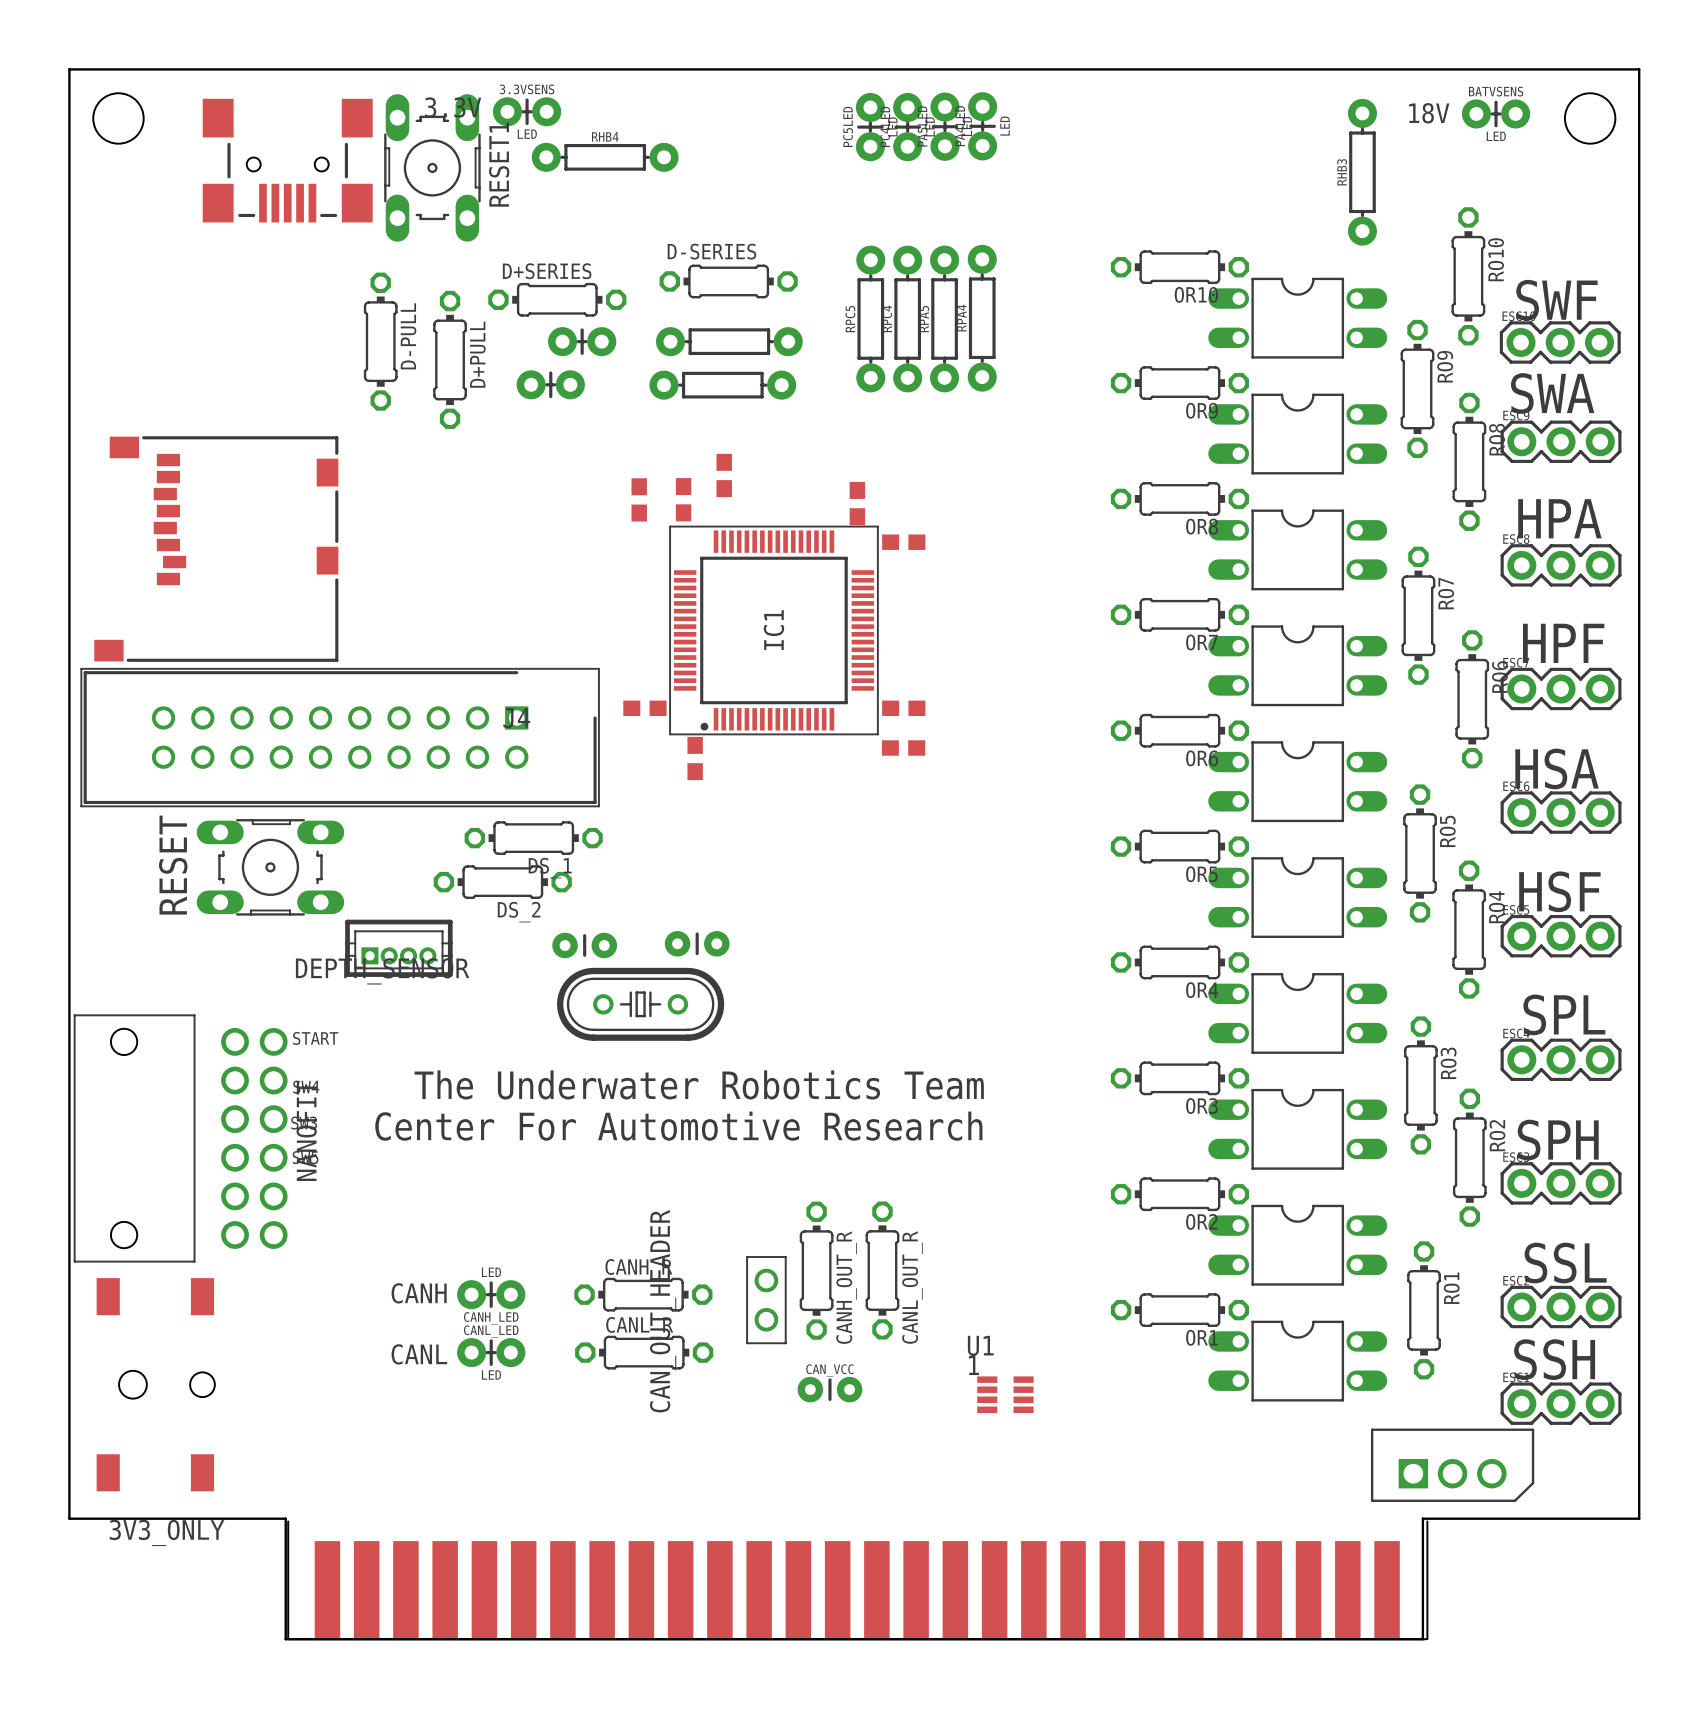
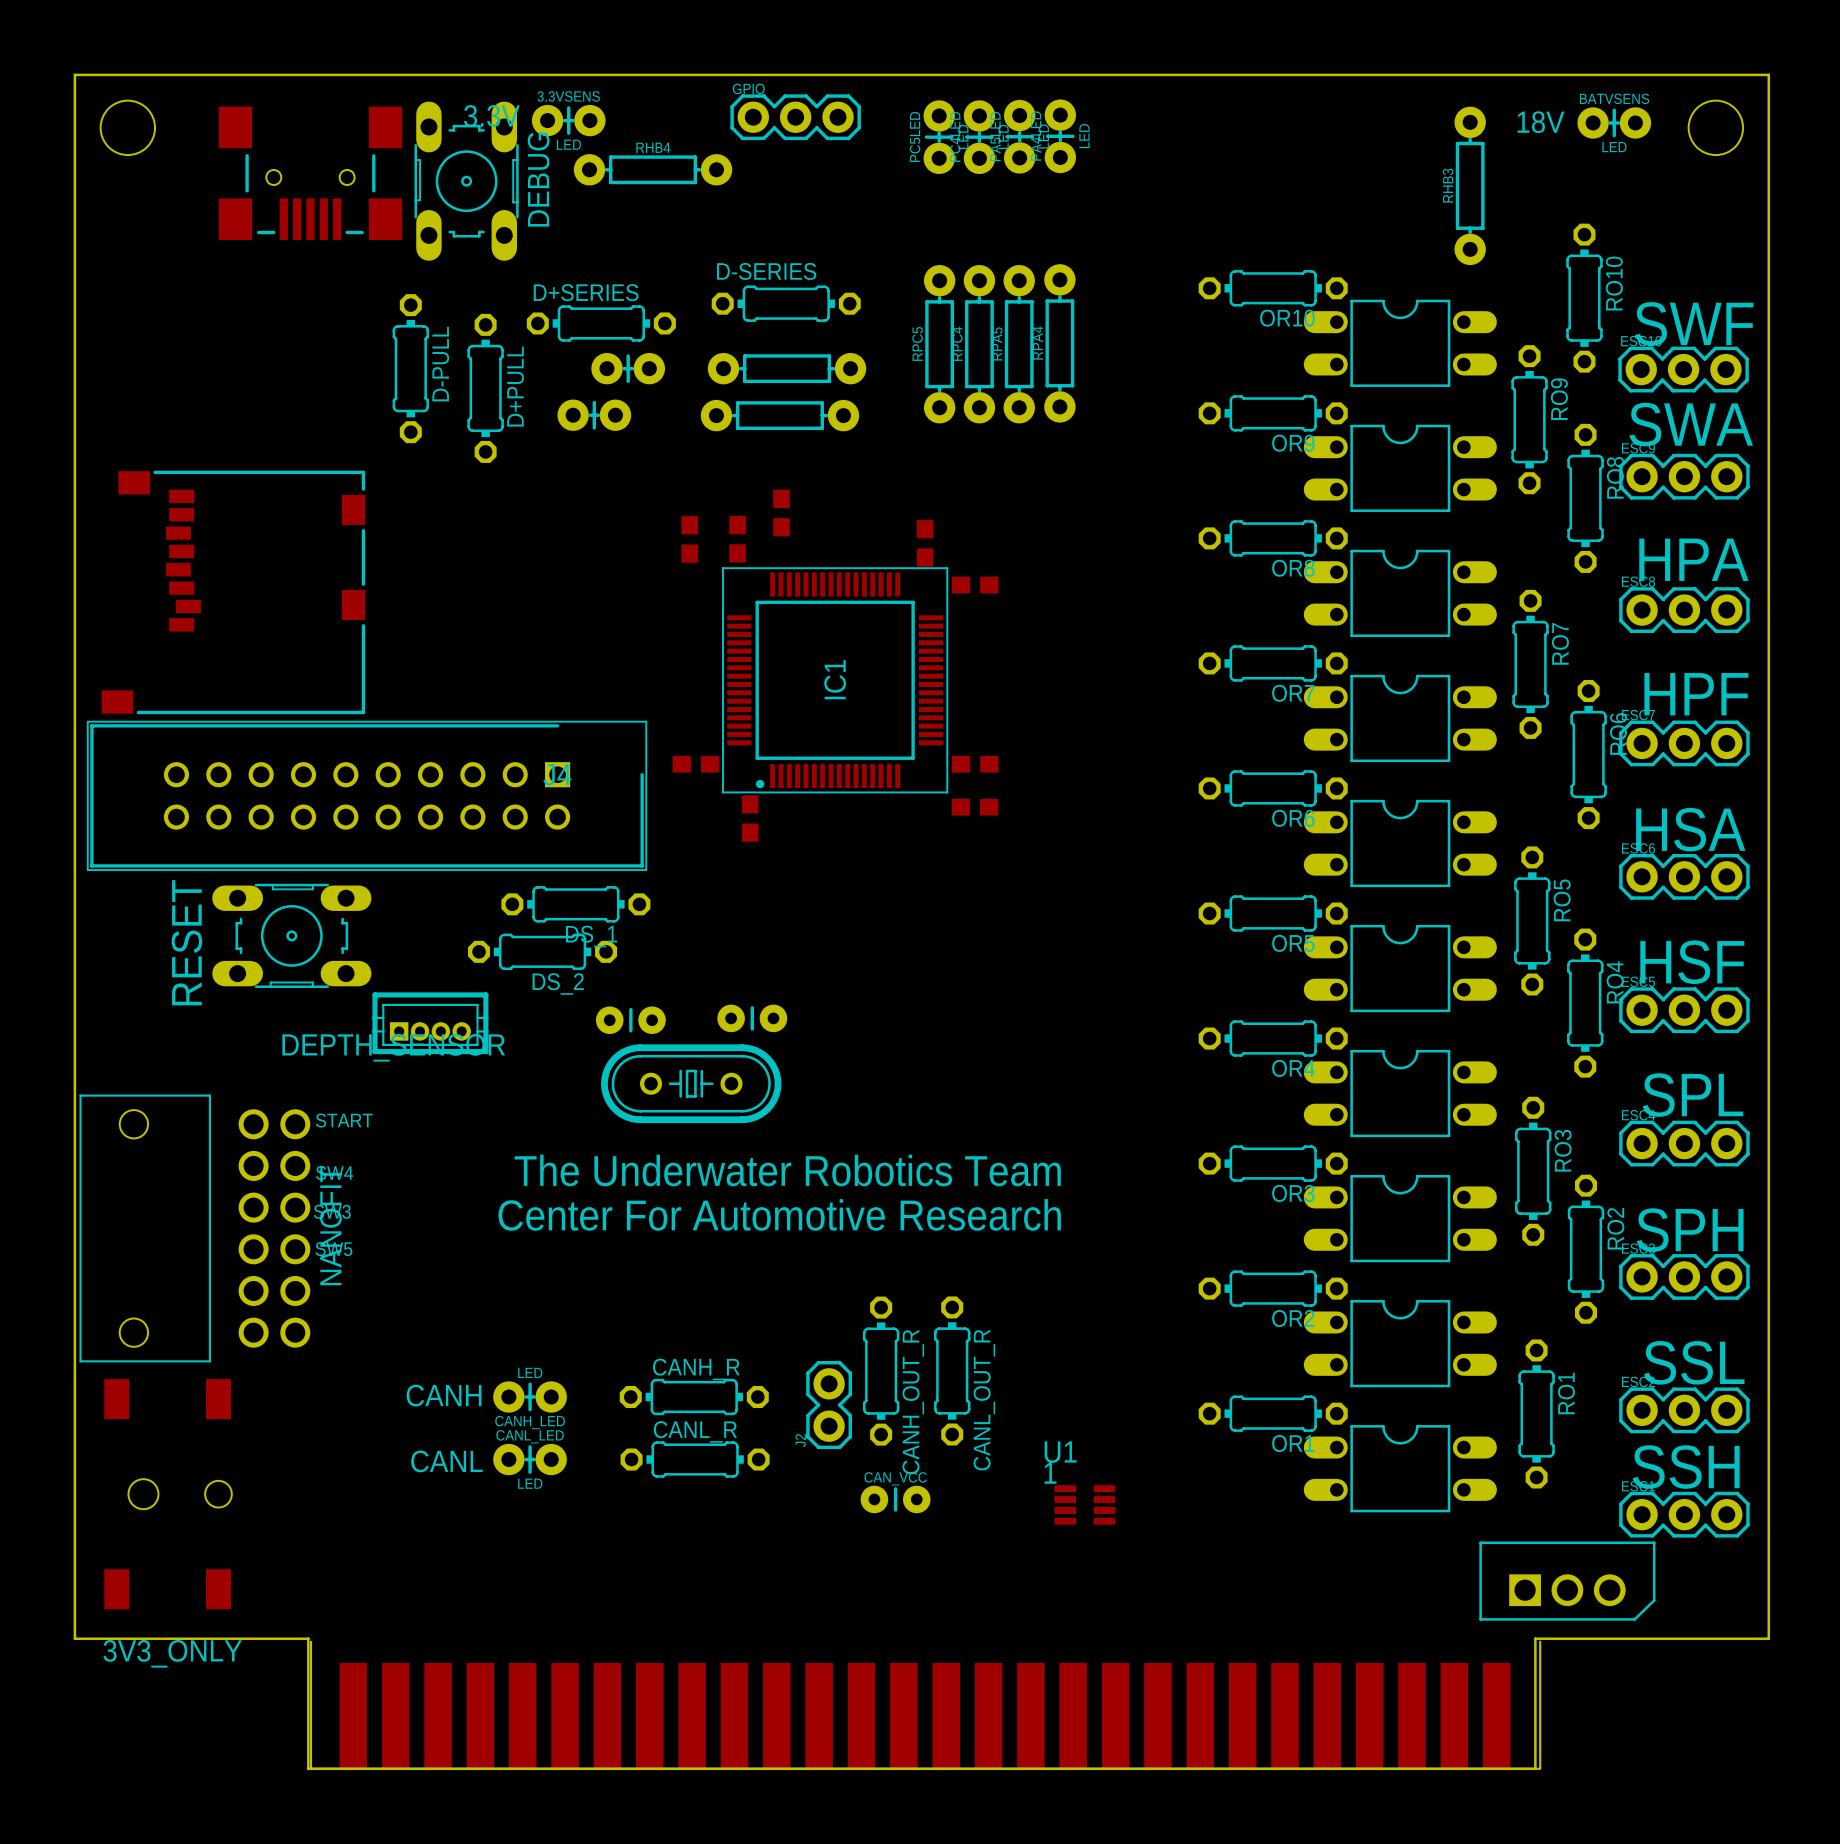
GPIO: none -> (795, 117)
RESET1 name: RESET1 (499, 164) -> DEBUG (538, 179)
CAN_OUT_HEADER: (766, 1300) -> none
J2: none -> (829, 1405)

